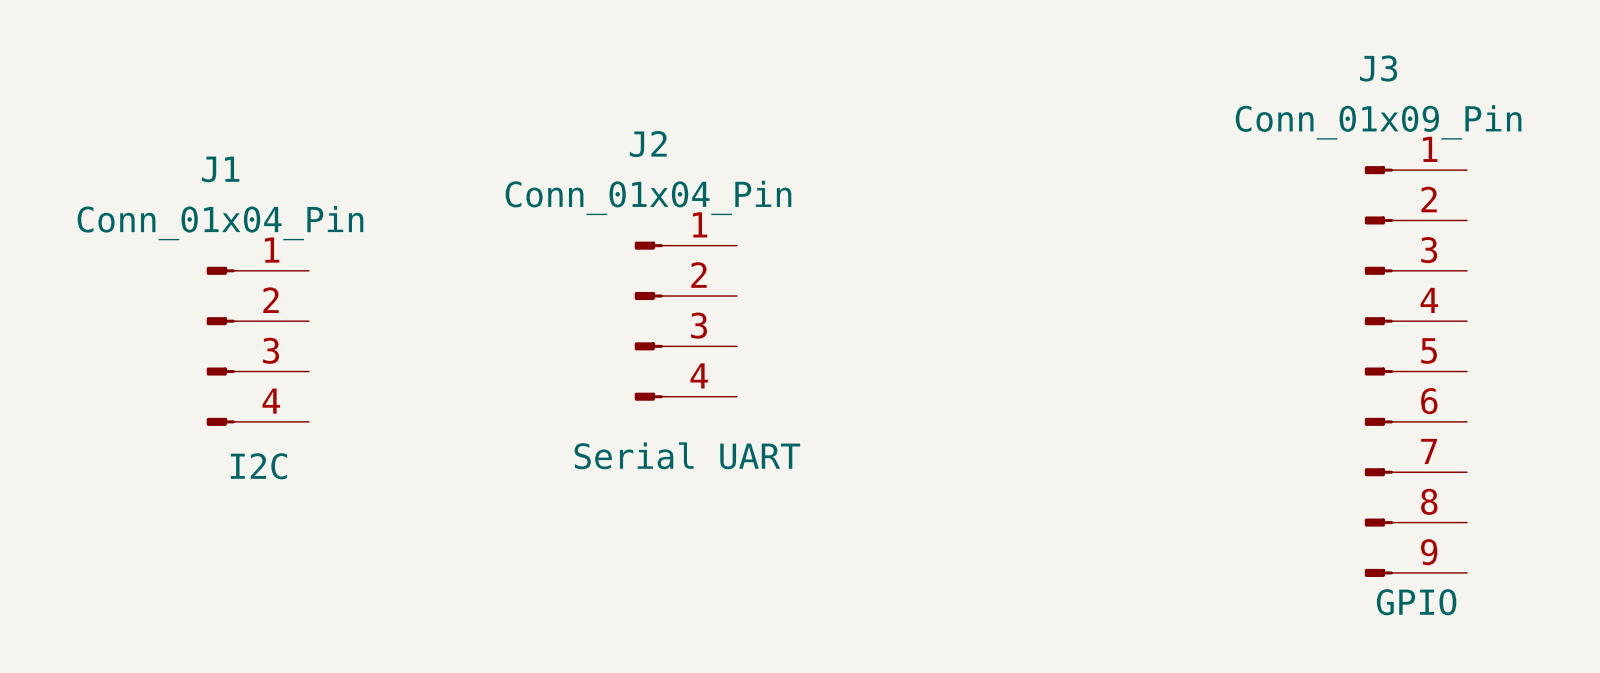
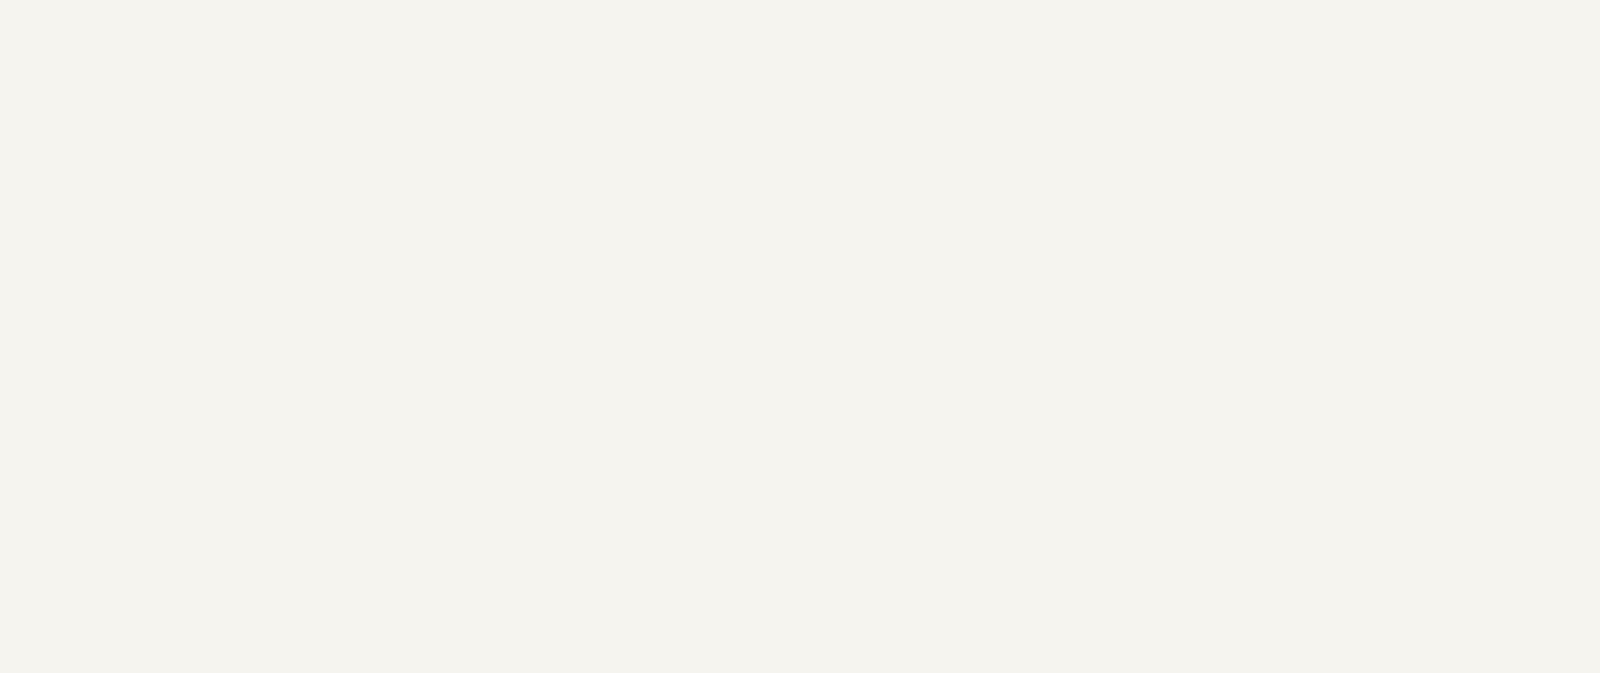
J2: Conn_01x04_Pin (685, 321) -> none
J1: Conn_01x04_Pin (257, 346) -> none
J3: Conn_01x09_Pin (1415, 371) -> none

